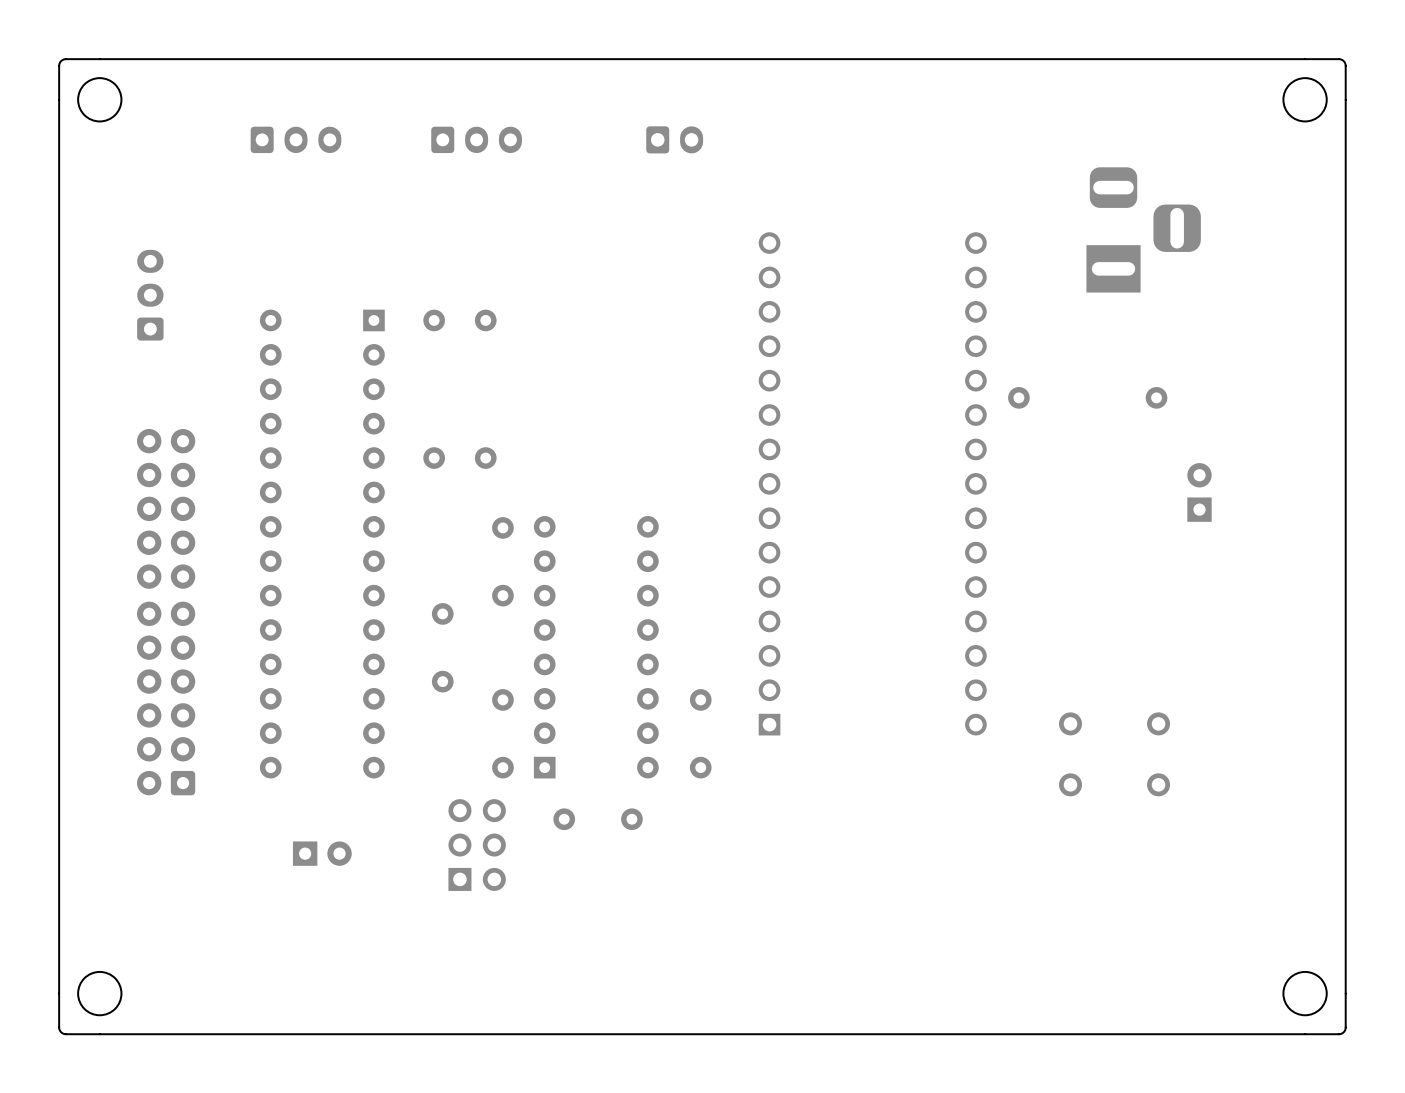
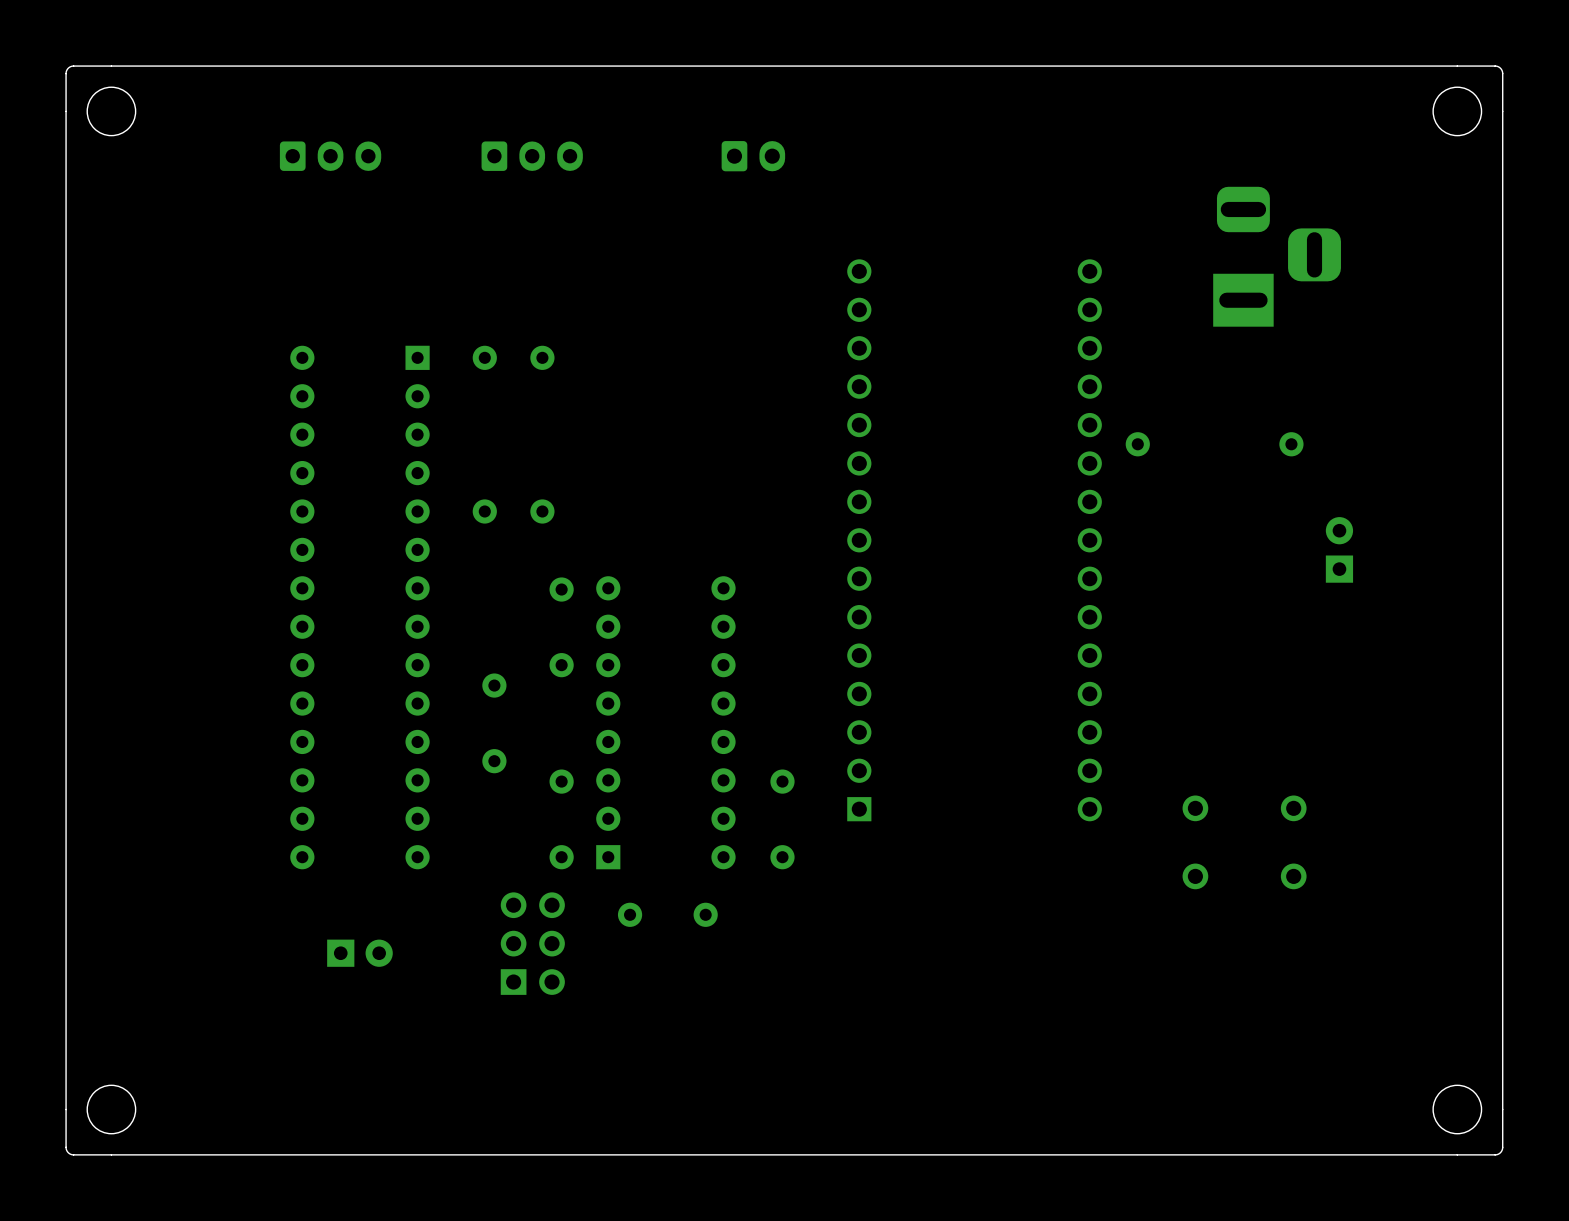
part: (150, 295) -> none
part: (166, 612) -> none

